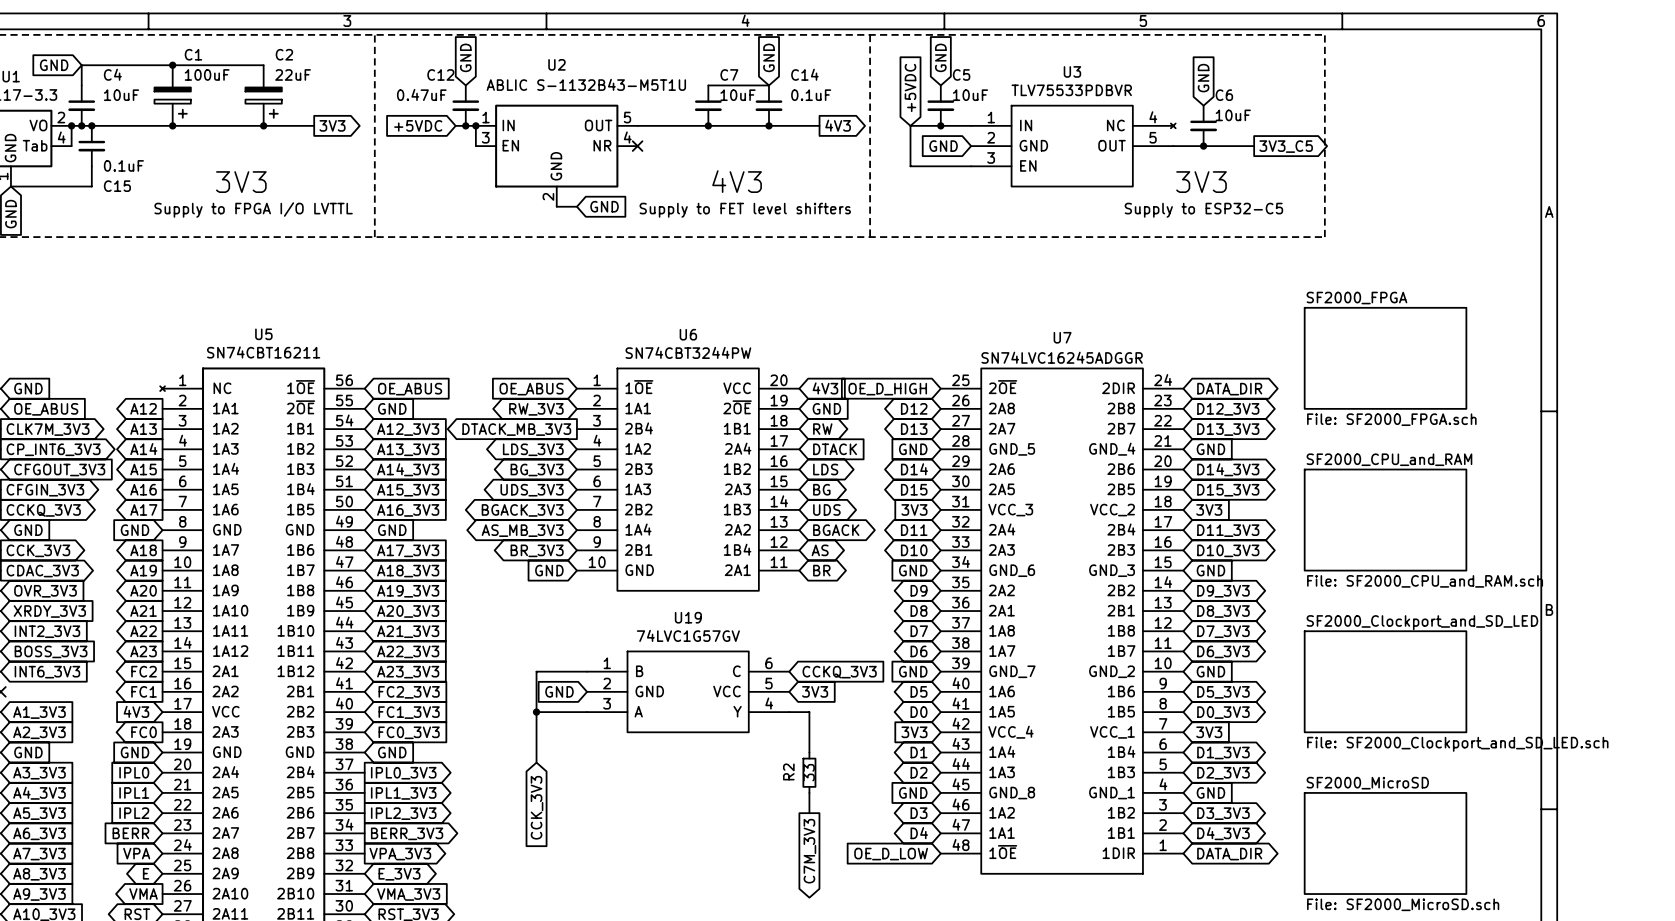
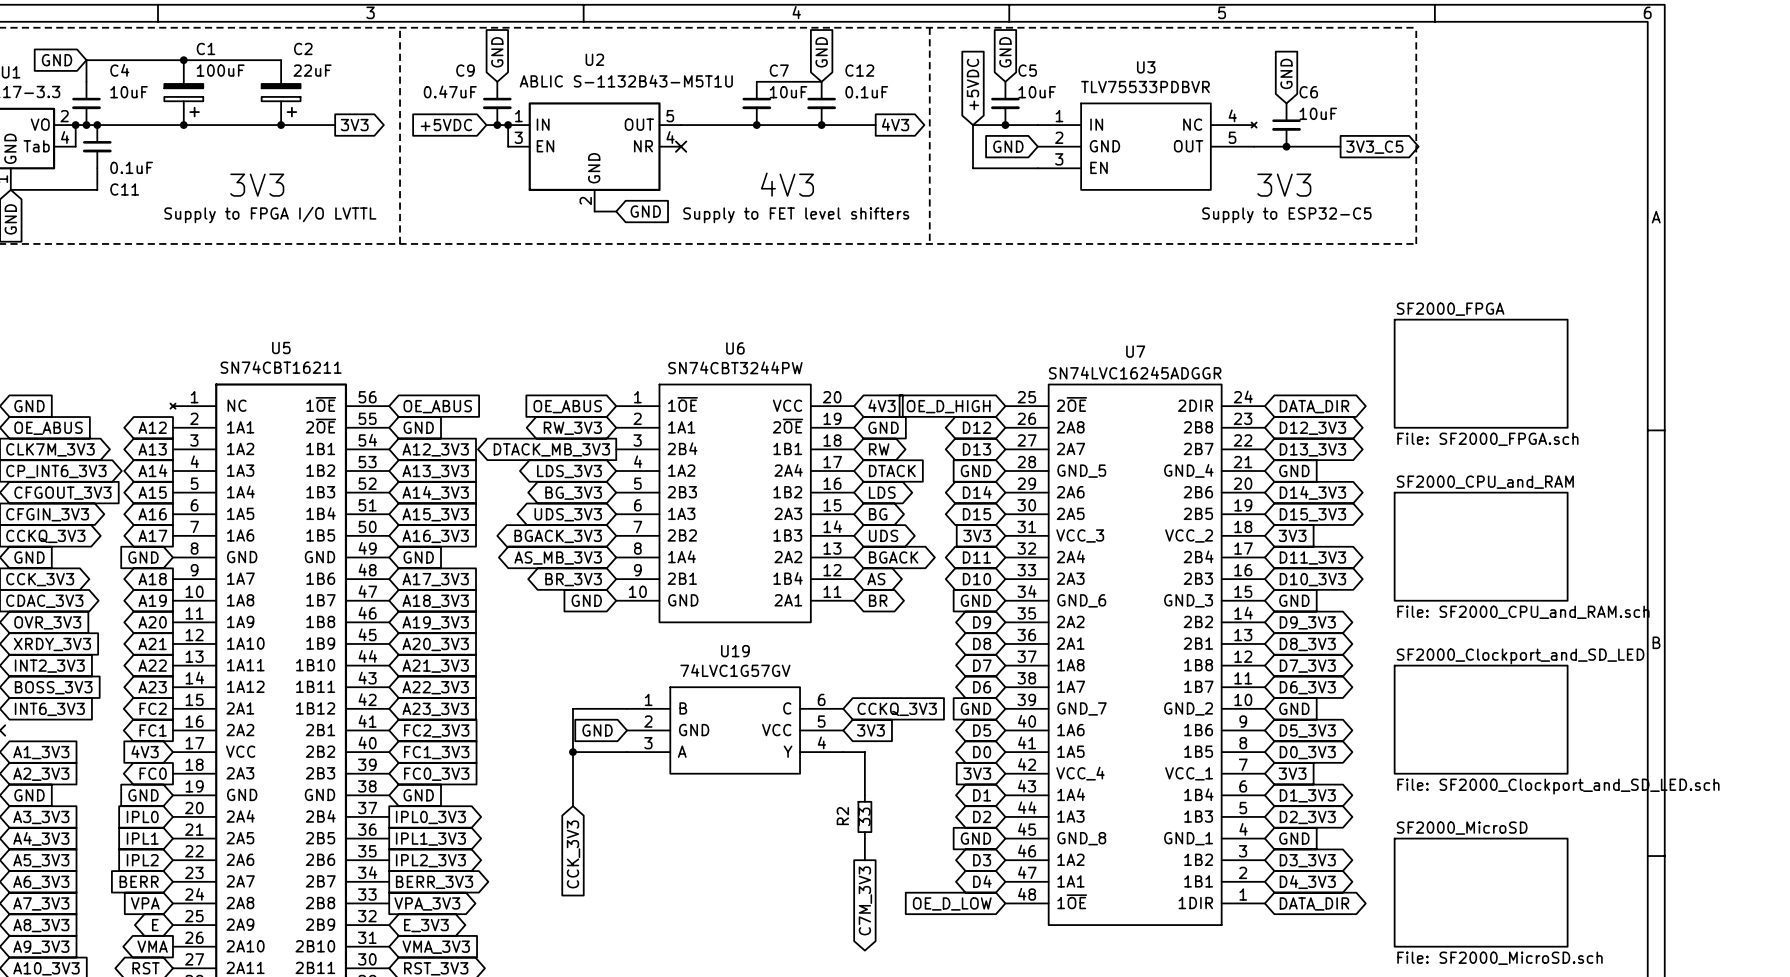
C12 name: C12 (440, 74) -> C9 (465, 70)
C14 name: C14 (804, 74) -> C12 (859, 70)
C15 name: C15 (117, 186) -> C11 (124, 189)

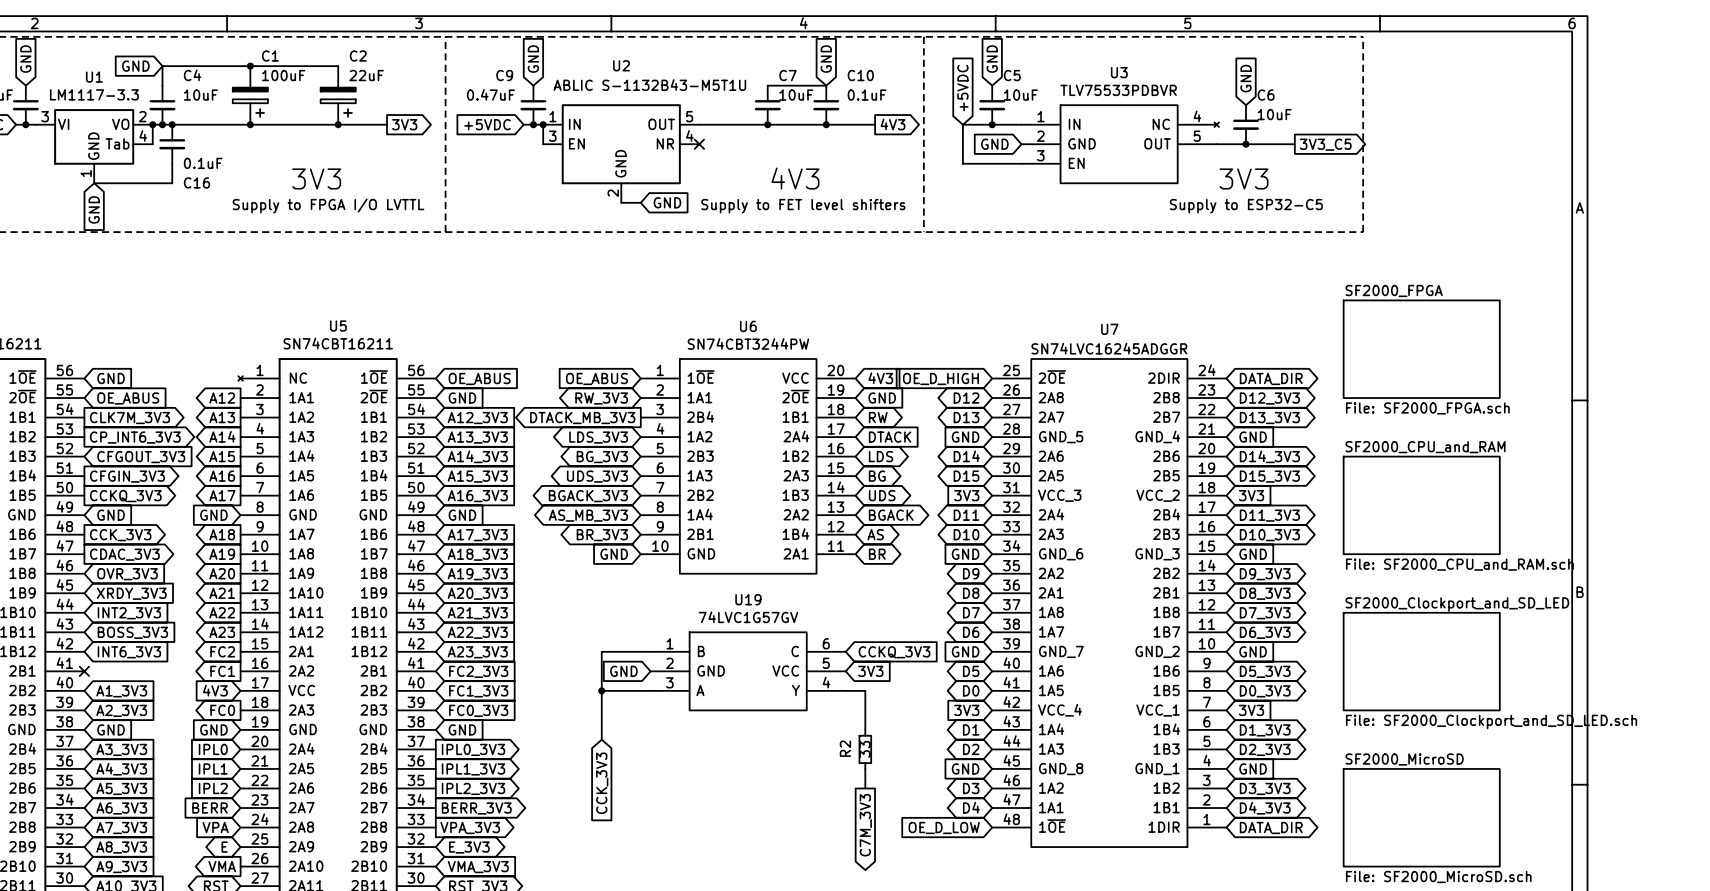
C12 name: C12 (859, 70) -> C10 (860, 75)
C11 name: C11 (124, 189) -> C16 (196, 182)

